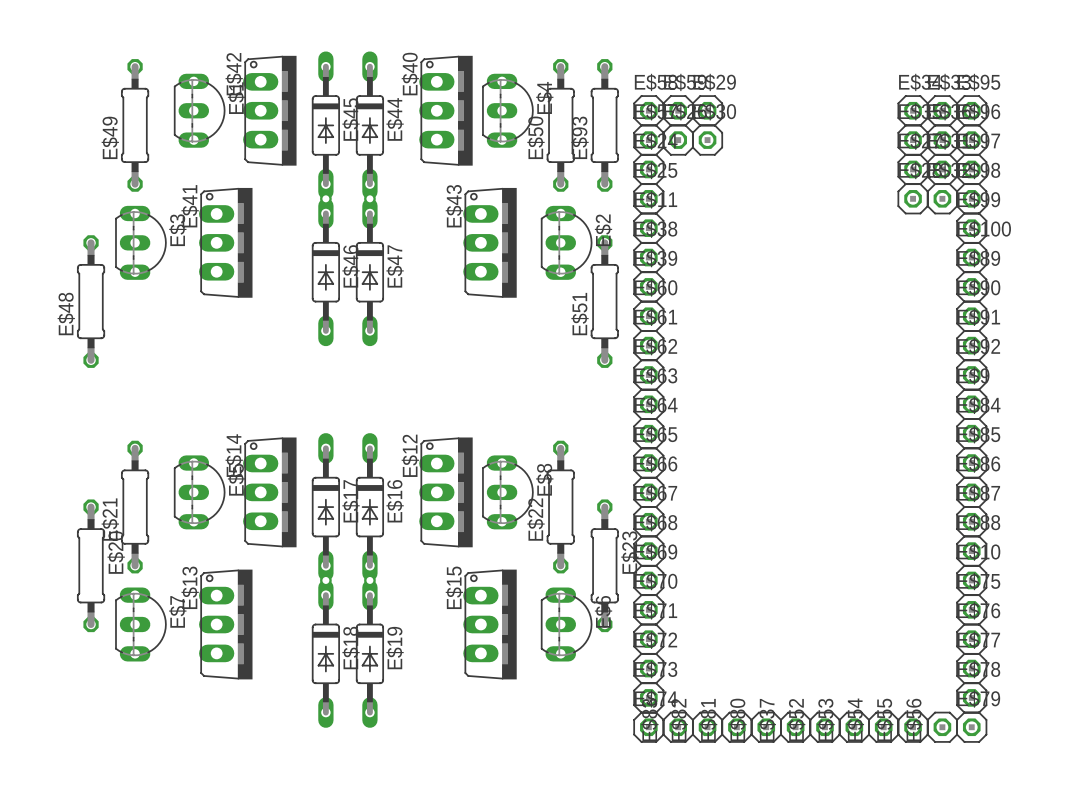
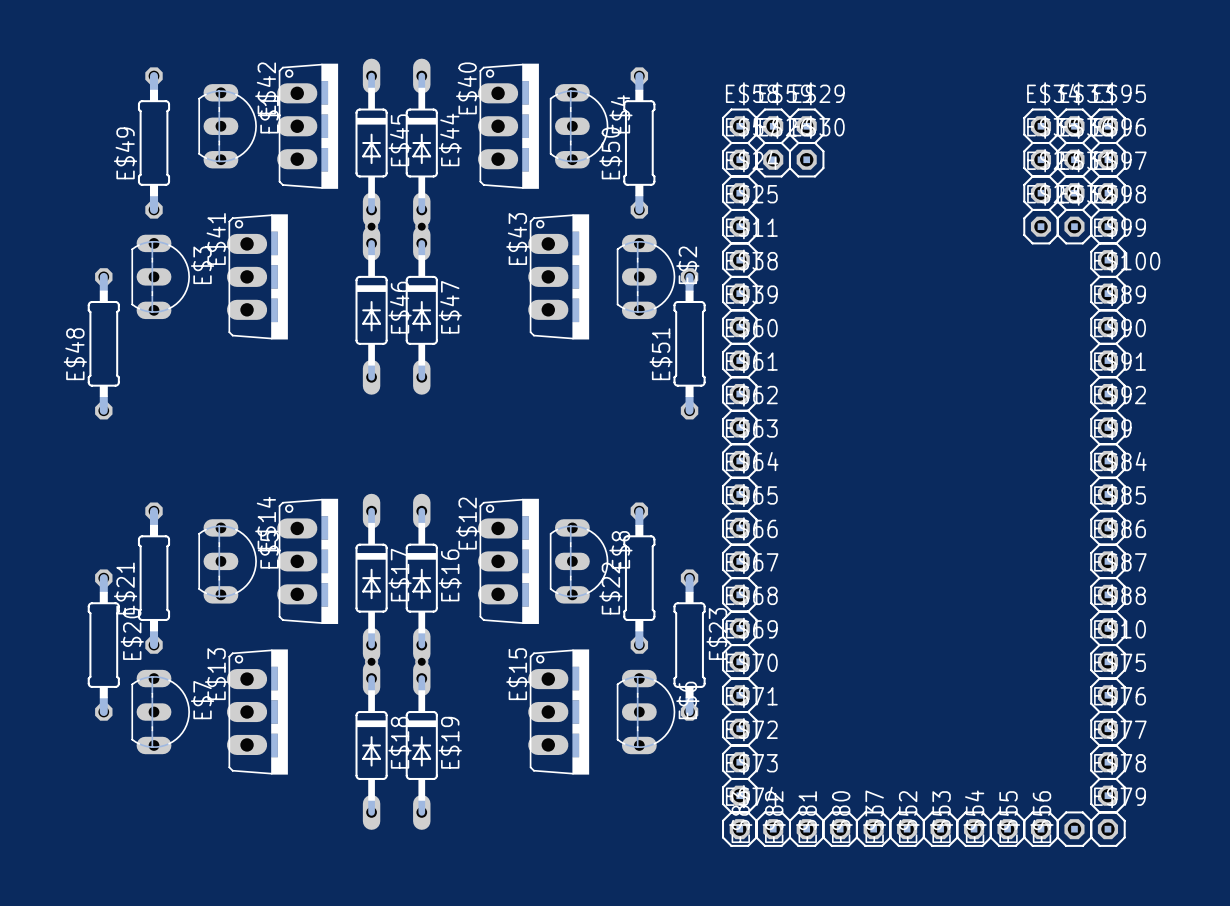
E$93: (604, 125) -> none

